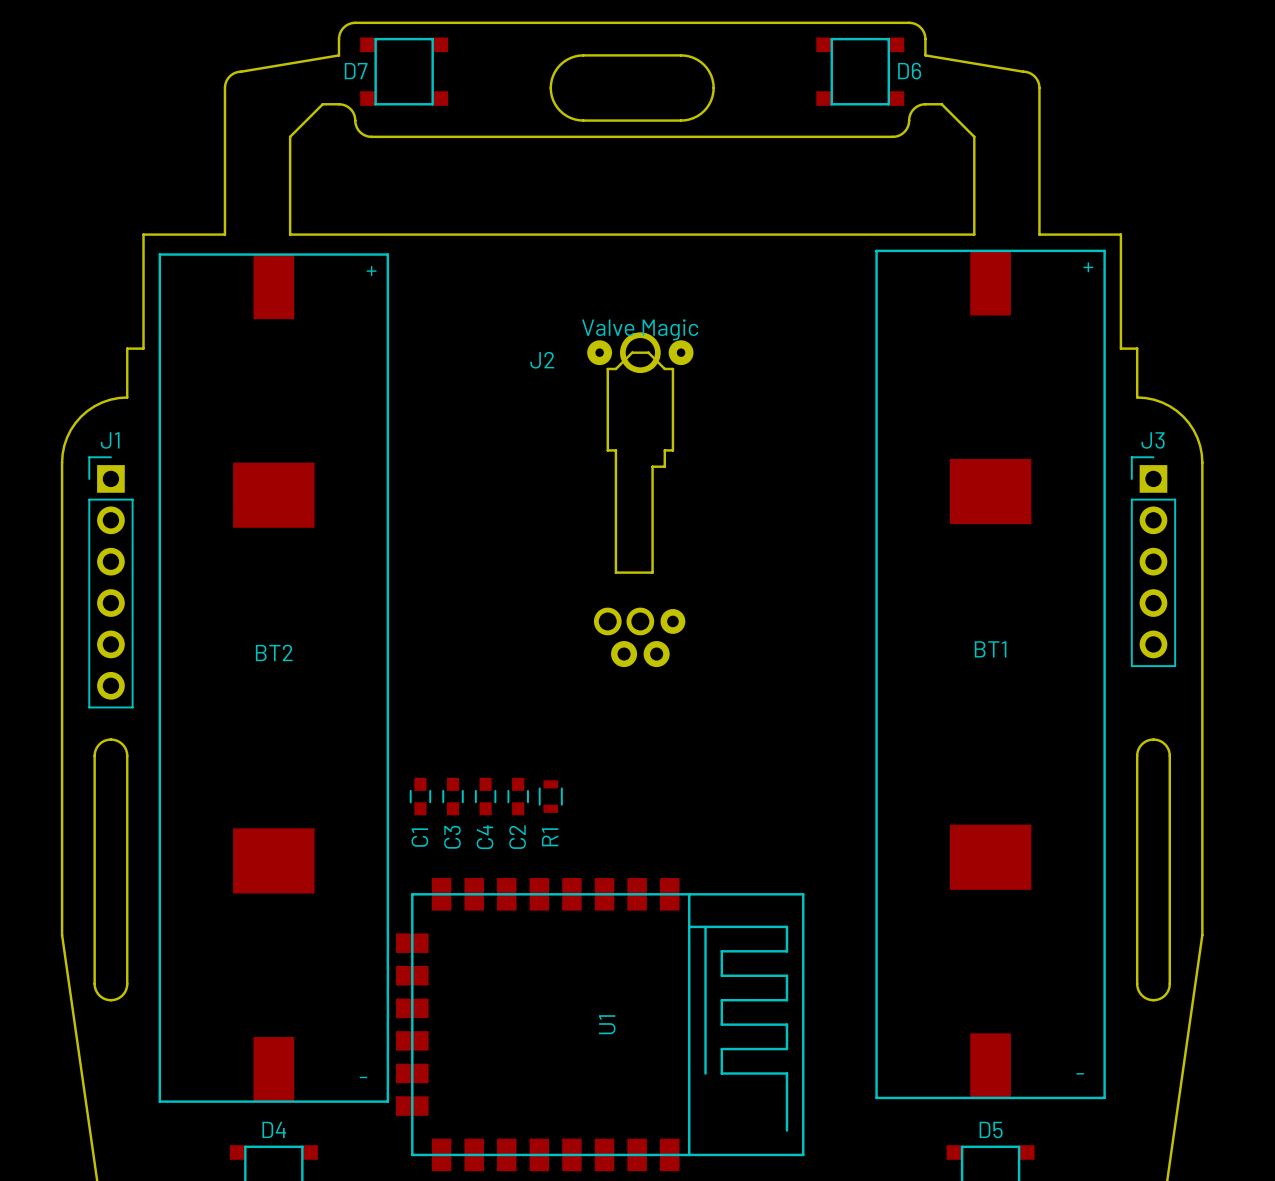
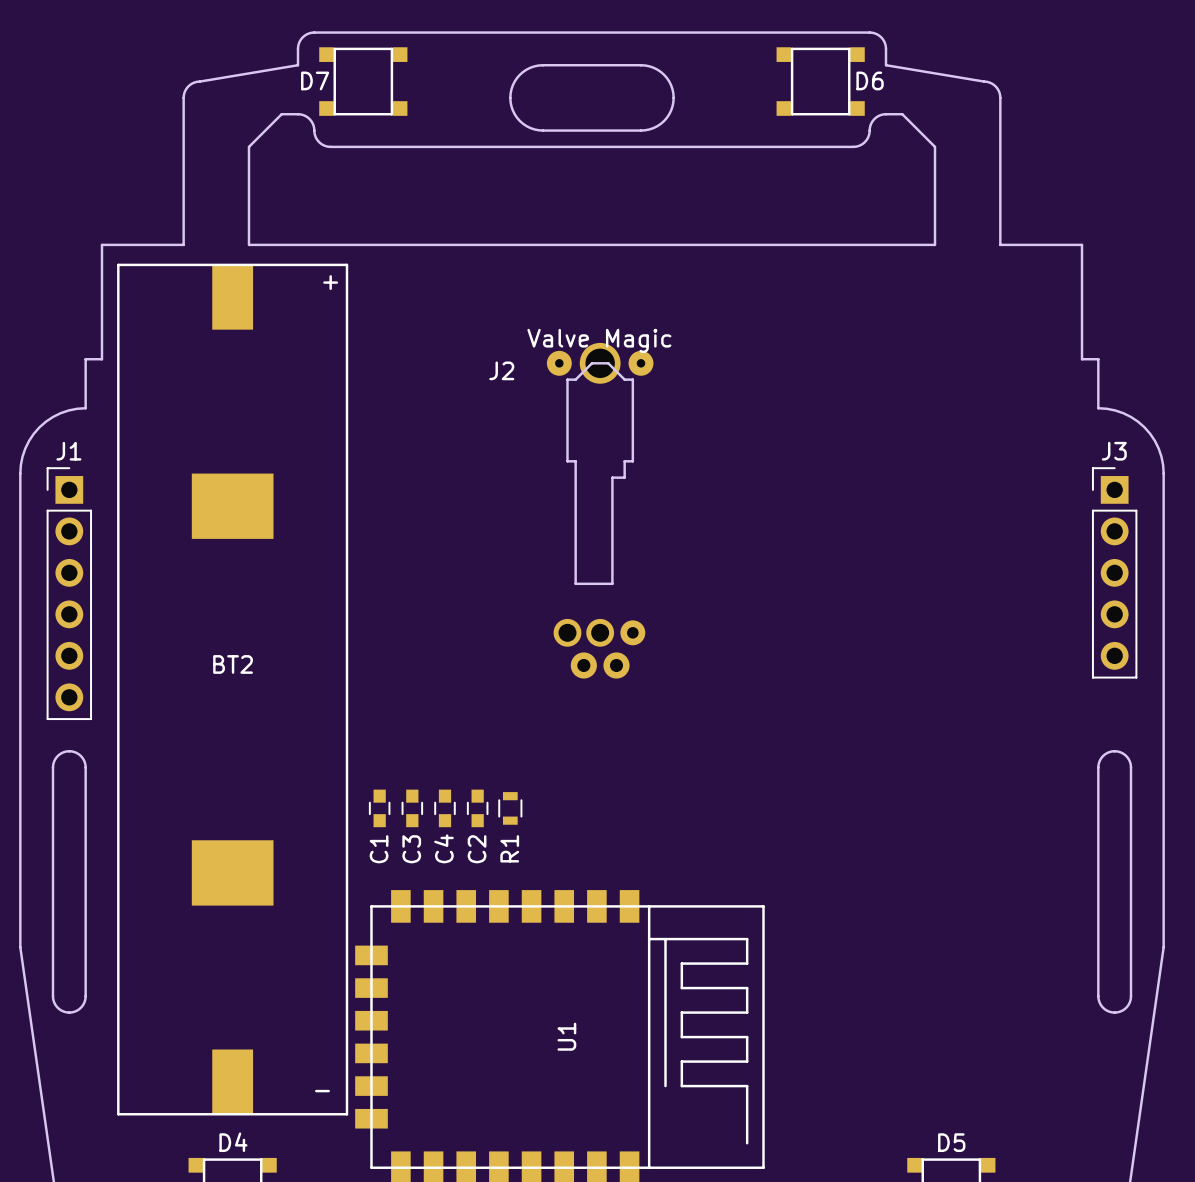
BT1: (990, 674) -> none

